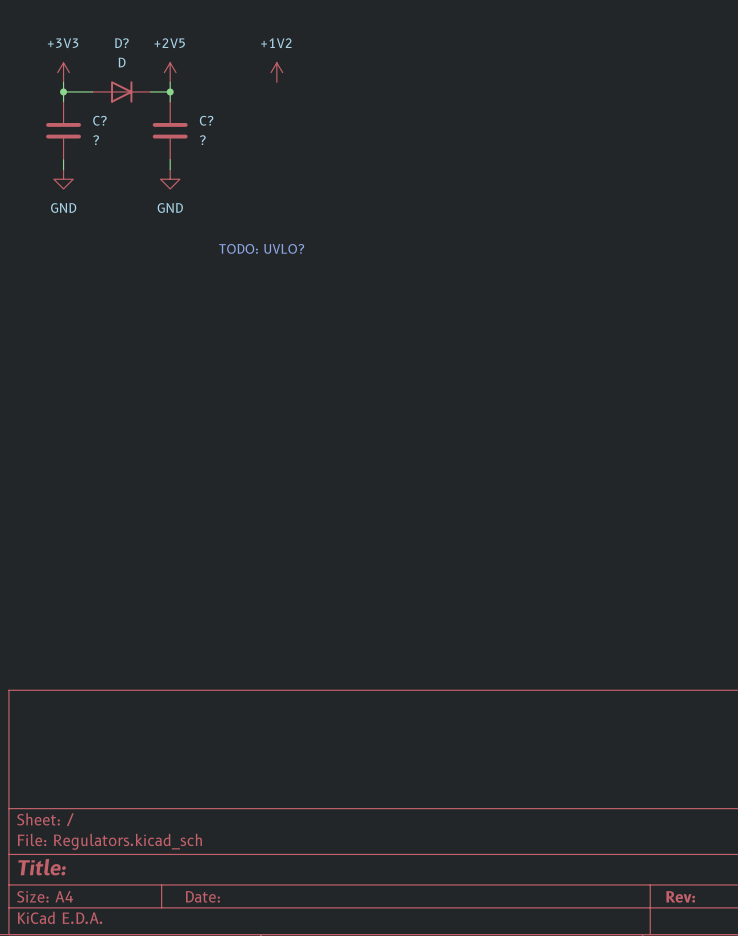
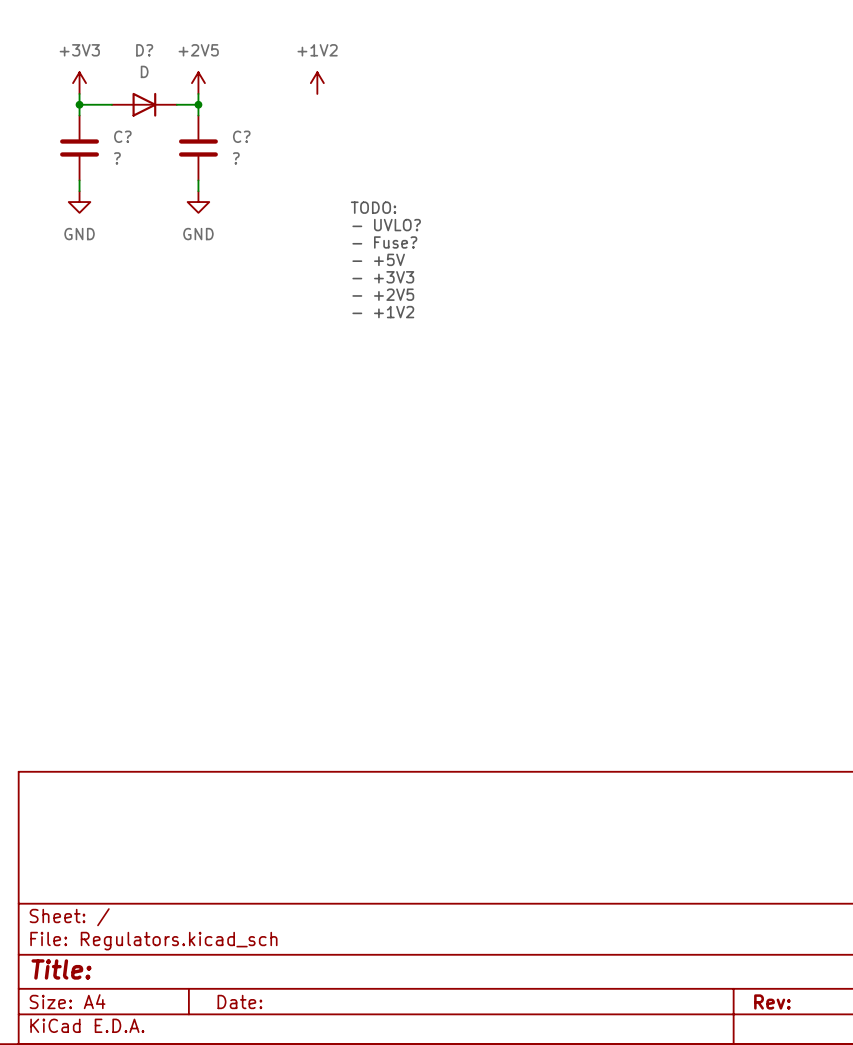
text: none -> TODO: (373, 207)
text: none -> - UVLO? (386, 225)
text: none -> - Fuse? (384, 242)
text: none -> - +5V (378, 259)
text: none -> - +3V3 (383, 277)
text: TODO: UVLO? (261, 248) -> none
text: none -> - +2V5 (383, 294)
text: none -> - +1V2 (383, 312)

